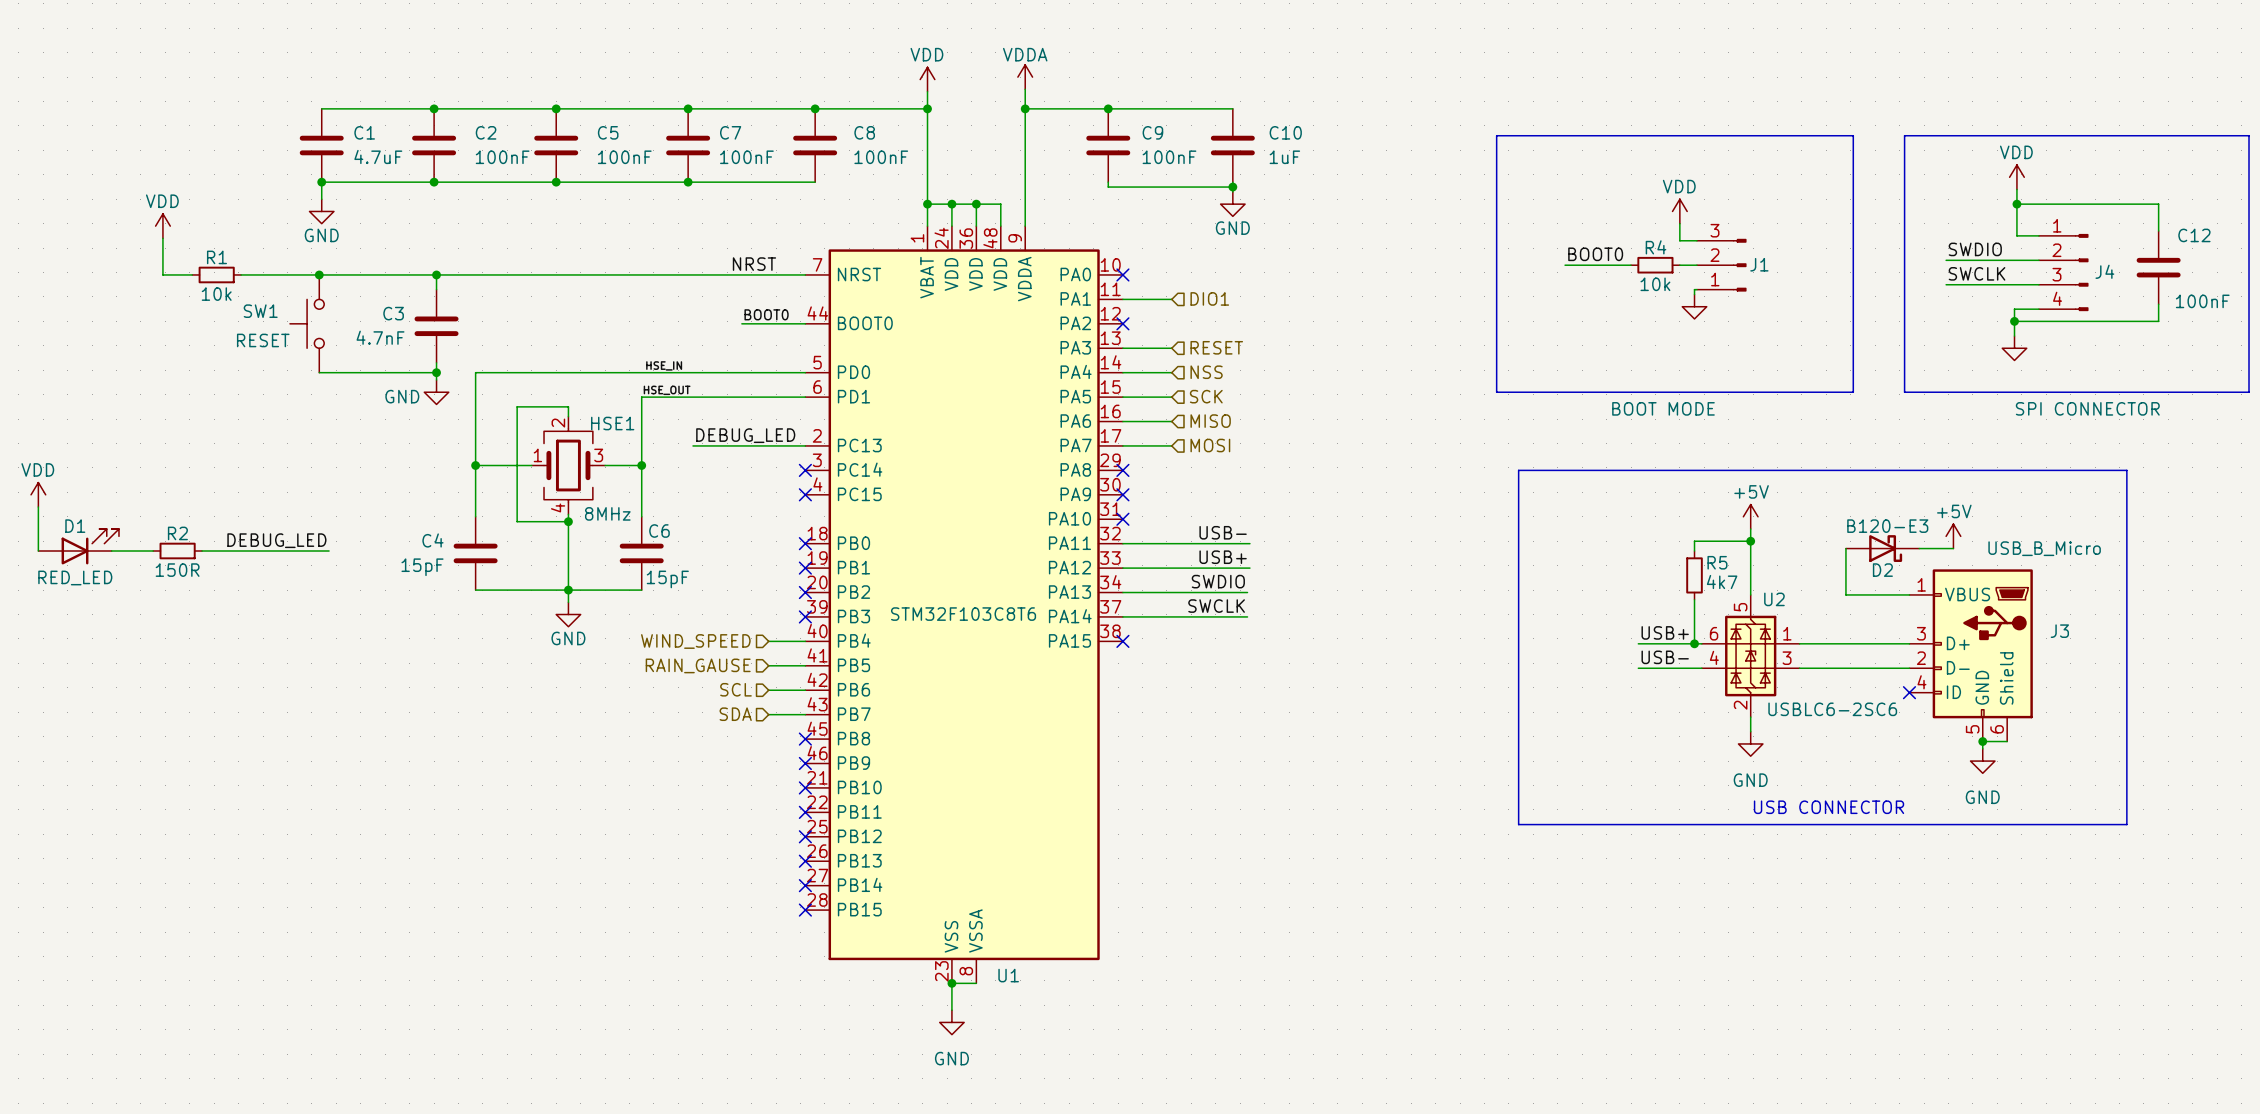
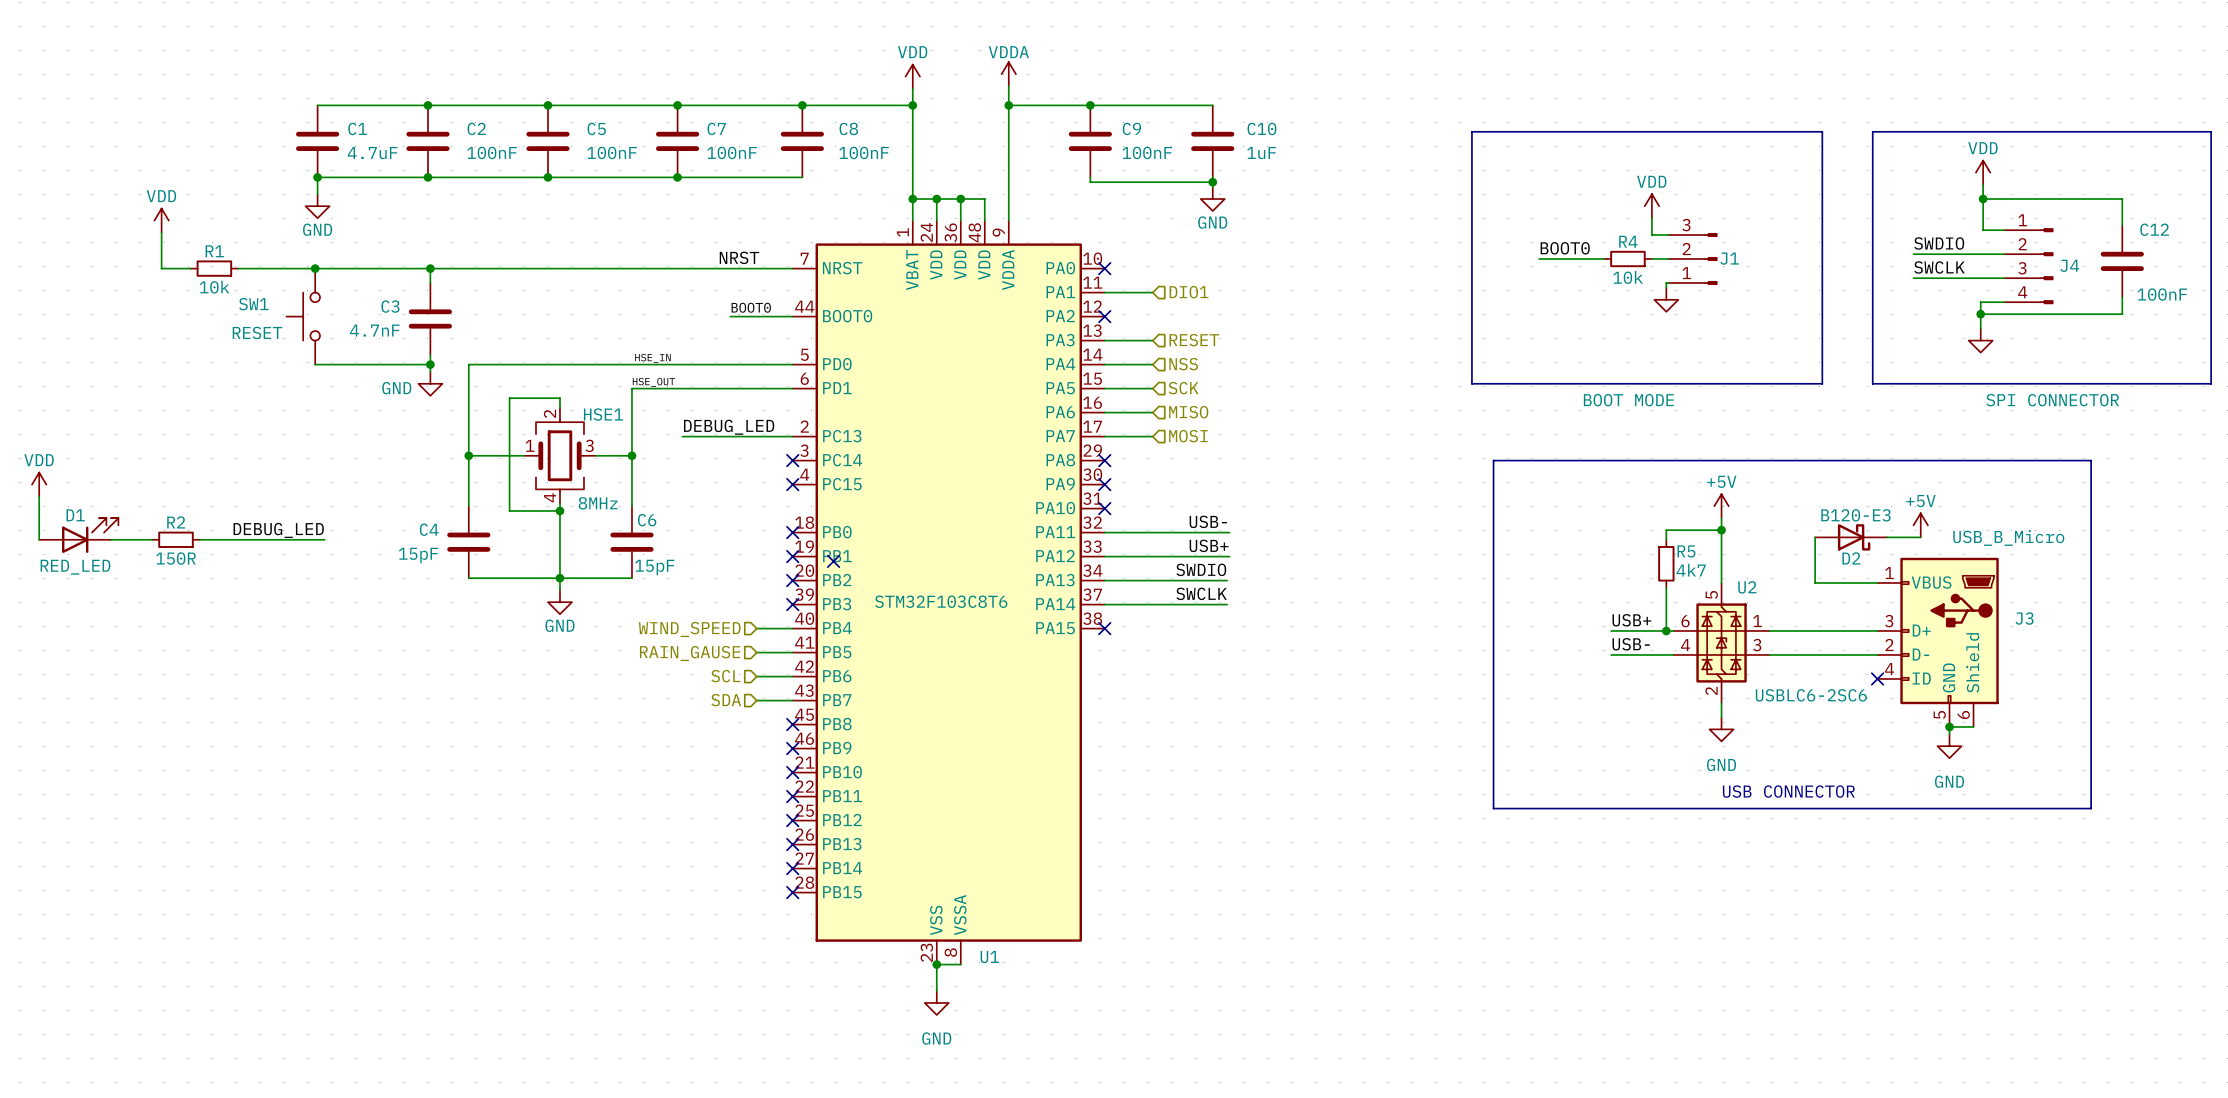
no-connect mark: none -> (833, 561)

